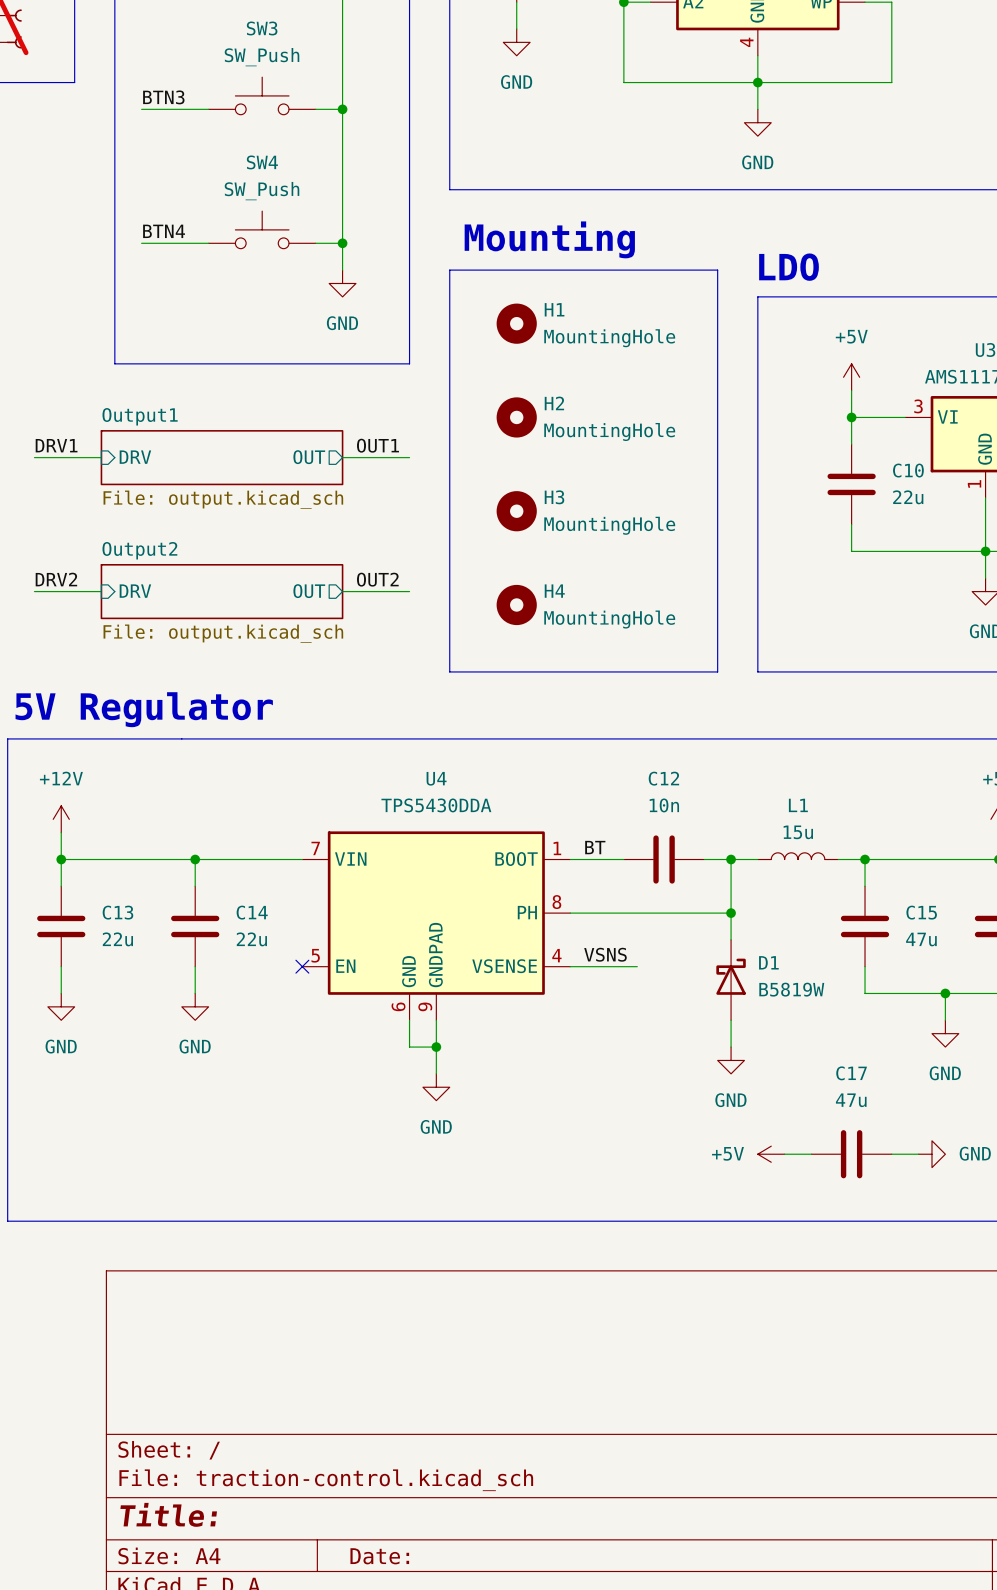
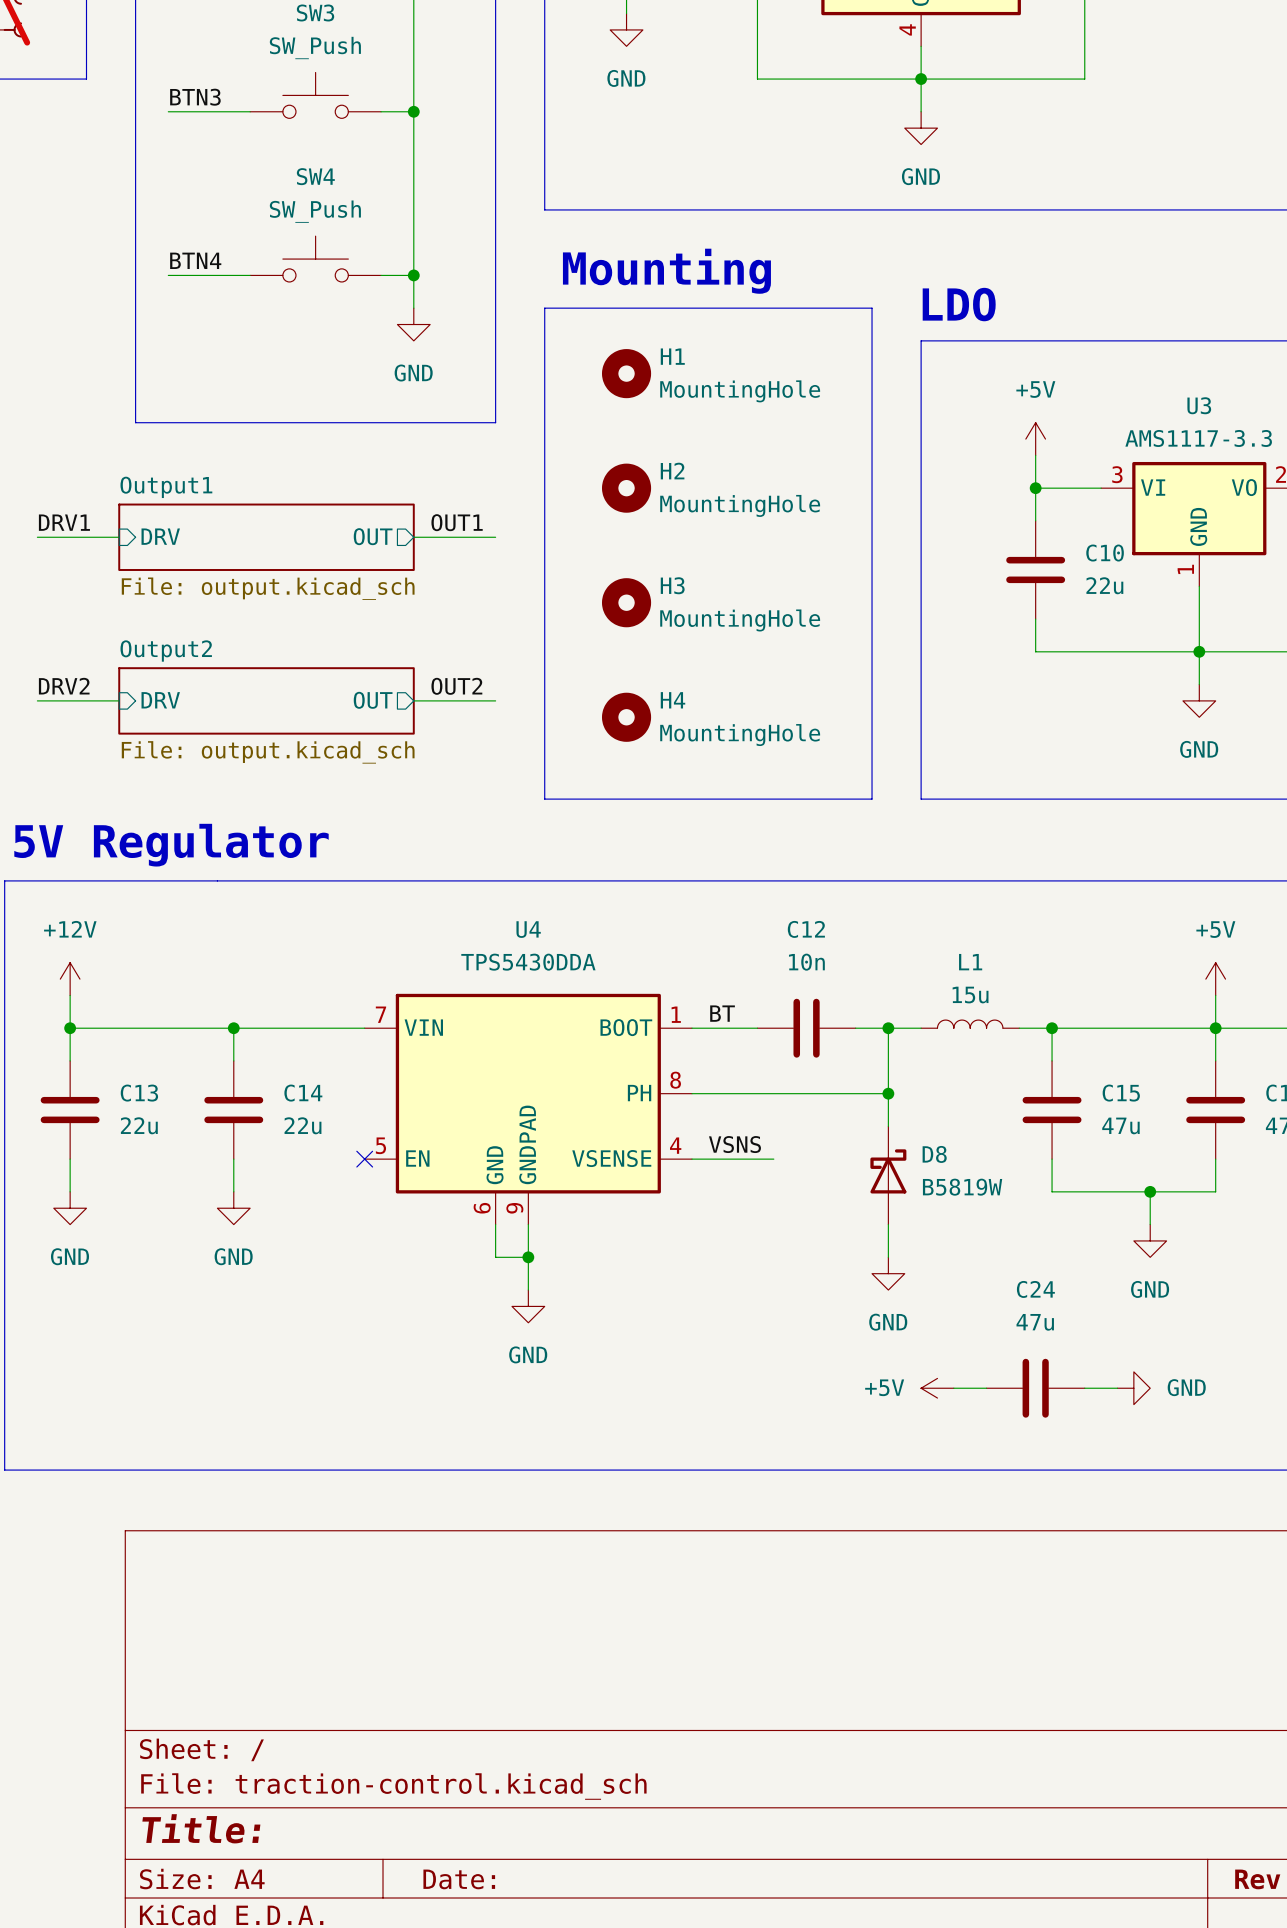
D1 name: D1 (768, 962) -> D8 (934, 1154)
C17 name: C17 (851, 1073) -> C24 (1035, 1289)

